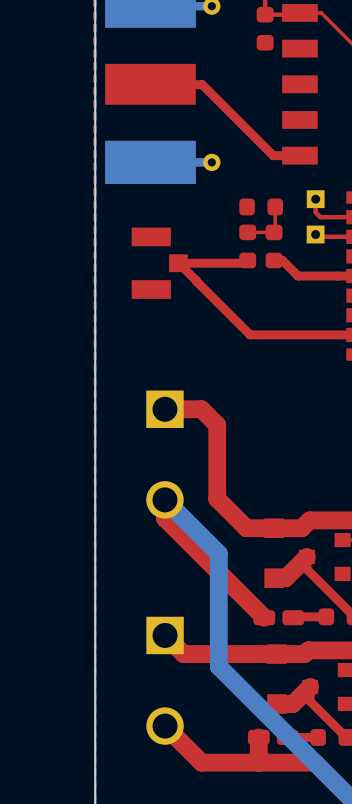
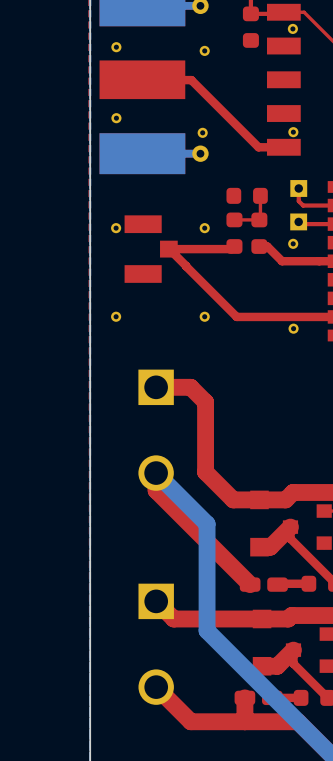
part: none -> (292, 28)
part: none -> (116, 47)
part: none -> (204, 50)
part: none -> (116, 118)
part: none -> (293, 132)
part: none -> (202, 132)
part: none -> (116, 228)
part: none -> (204, 228)
part: none -> (293, 243)
part: none -> (116, 316)
part: none -> (204, 316)
part: none -> (293, 328)

